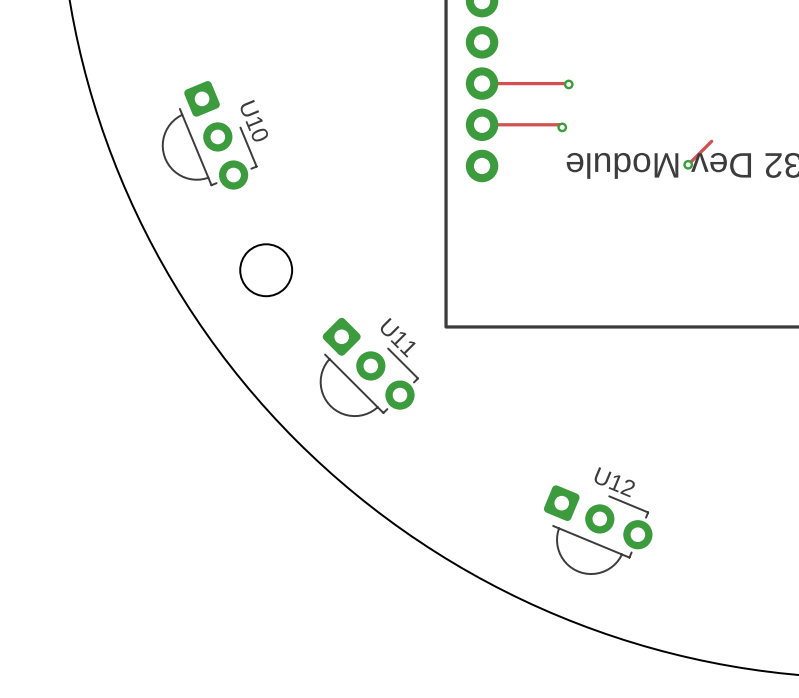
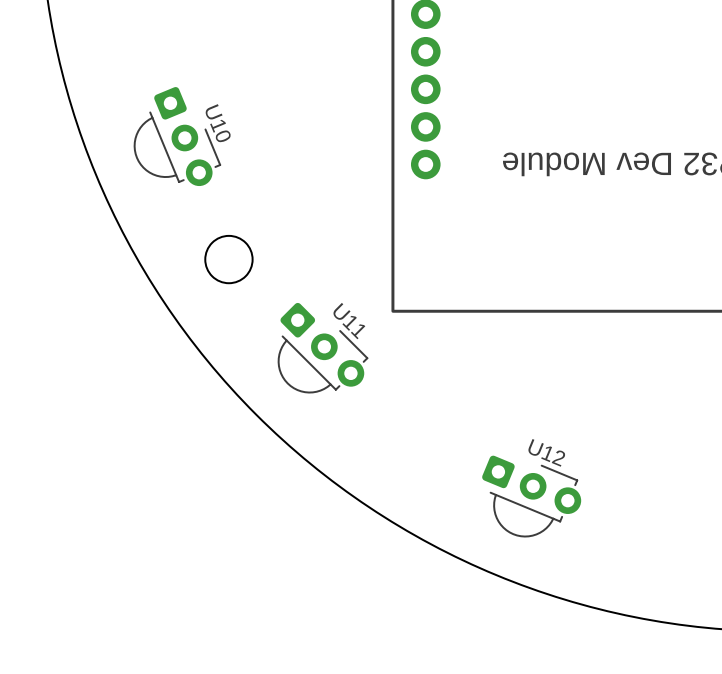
track: (482, 83) (568, 84) -> none
via: (568, 84) -> none
track: (482, 124) (559, 124) (562, 127) -> none
via: (562, 127) -> none
track: (711, 141) (688, 164) -> none
via: (688, 164) -> none

